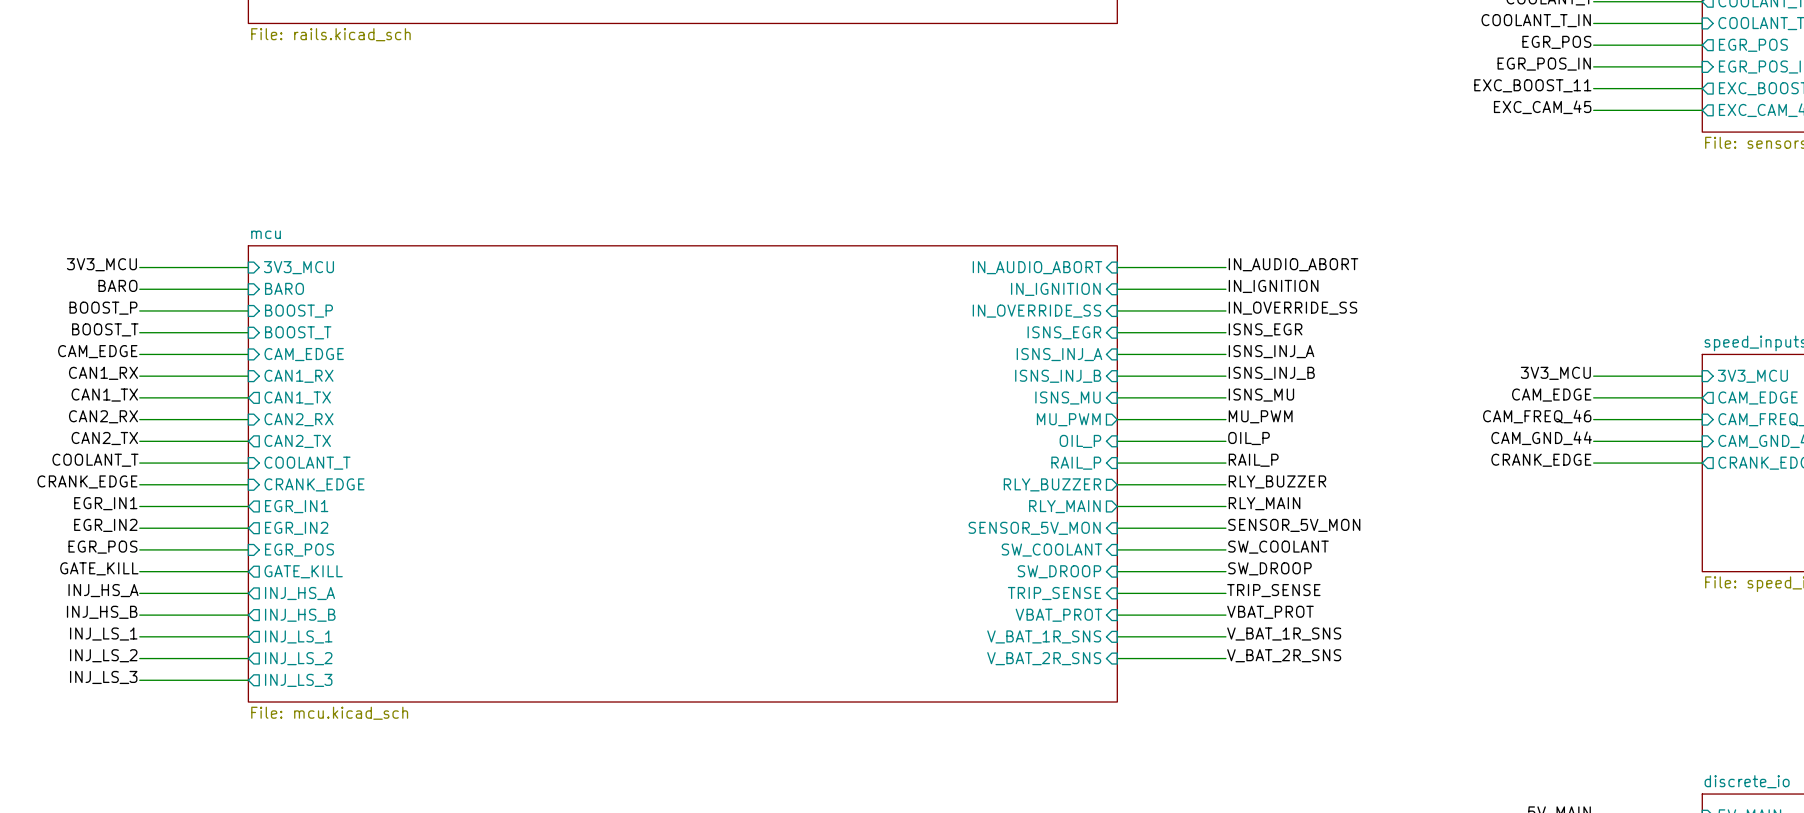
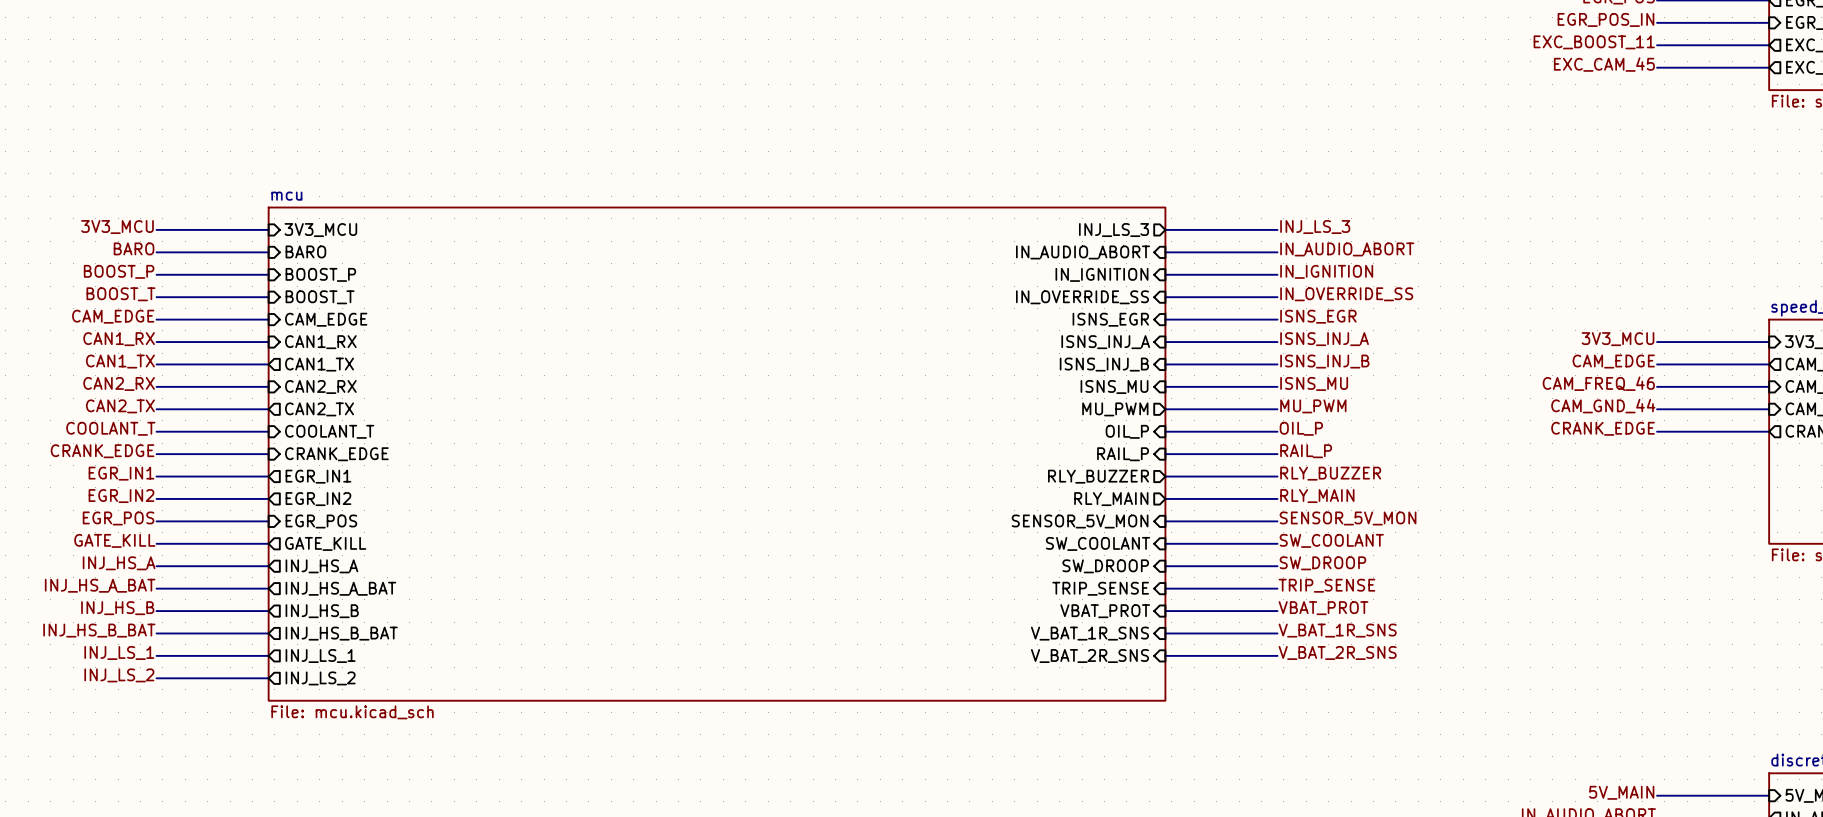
label: IN_AUDIO_ABORT (1293, 264) -> INJ_LS_3 (1315, 227)
sheet pin shape: input (1037, 267) -> output (1113, 230)
sheet pin: IN_AUDIO_ABORT (1037, 267) -> INJ_LS_3 (1113, 230)
label: IN_IGNITION (1273, 286) -> IN_AUDIO_ABORT (1347, 249)
sheet pin: IN_IGNITION (1055, 289) -> IN_AUDIO_ABORT (1083, 252)
label: IN_OVERRIDE_SS (1292, 308) -> IN_IGNITION (1326, 271)
sheet pin: IN_OVERRIDE_SS (1036, 311) -> IN_IGNITION (1101, 274)
label: ISNS_EGR (1265, 329) -> IN_OVERRIDE_SS (1346, 294)
sheet pin: ISNS_EGR (1064, 332) -> IN_OVERRIDE_SS (1082, 297)
label: ISNS_INJ_A (1271, 351) -> ISNS_EGR (1318, 316)
sheet pin: ISNS_INJ_A (1059, 354) -> ISNS_EGR (1110, 319)
label: ISNS_INJ_B (1271, 373) -> ISNS_INJ_A (1324, 339)
sheet pin: ISNS_INJ_B (1058, 376) -> ISNS_INJ_A (1105, 342)
label: ISNS_MU (1261, 395) -> ISNS_INJ_B (1324, 361)
sheet pin: ISNS_MU (1068, 397) -> ISNS_INJ_B (1104, 364)
label: MU_PWM (1260, 416) -> ISNS_MU (1314, 383)
sheet pin shape: output (1068, 419) -> input (1114, 386)
sheet pin: MU_PWM (1068, 419) -> ISNS_MU (1114, 386)
label: OIL_P (1249, 438) -> MU_PWM (1313, 406)
sheet pin shape: input (1080, 441) -> output (1115, 409)
sheet pin: OIL_P (1080, 441) -> MU_PWM (1115, 409)
label: RAIL_P (1253, 460) -> OIL_P (1301, 428)
sheet pin: RAIL_P (1076, 463) -> OIL_P (1127, 431)
sheet mcu: File: mcu.kicad_sch (682, 473) -> none
label: RLY_BUZZER (1277, 481) -> RAIL_P (1306, 451)
sheet mcu: none -> File: mcu.kicad_sch (717, 454)
sheet pin shape: output (1052, 484) -> input (1123, 454)
sheet pin: RLY_BUZZER (1052, 484) -> RAIL_P (1123, 454)
label: RLY_MAIN (1264, 503) -> RLY_BUZZER (1330, 473)
sheet pin: RLY_MAIN (1064, 506) -> RLY_BUZZER (1098, 476)
label: SENSOR_5V_MON (1294, 525) -> RLY_MAIN (1317, 496)
sheet pin shape: input (1034, 528) -> output (1111, 499)
sheet pin: SENSOR_5V_MON (1034, 528) -> RLY_MAIN (1111, 499)
label: SW_COOLANT (1278, 547) -> SENSOR_5V_MON (1348, 518)
sheet pin: SW_COOLANT (1051, 550) -> SENSOR_5V_MON (1080, 521)
label: SW_DROOP (1269, 568) -> SW_COOLANT (1331, 540)
sheet pin: SW_DROOP (1059, 571) -> SW_COOLANT (1097, 543)
label: TRIP_SENSE (1273, 590) -> SW_DROOP (1322, 563)
sheet pin: TRIP_SENSE (1054, 593) -> SW_DROOP (1105, 566)
label: INJ_HS_B (102, 612) -> INJ_HS_A_BAT (100, 585)
label: VBAT_PROT (1270, 612) -> TRIP_SENSE (1326, 585)
sheet pin: INJ_HS_B (300, 615) -> INJ_HS_A_BAT (340, 588)
sheet pin: VBAT_PROT (1058, 615) -> TRIP_SENSE (1100, 588)
label: INJ_LS_1 (103, 634) -> INJ_HS_B (117, 608)
label: V_BAT_1R_SNS (1284, 634) -> VBAT_PROT (1323, 608)
sheet pin: INJ_LS_1 (298, 636) -> INJ_HS_B (322, 611)
sheet pin: V_BAT_1R_SNS (1044, 636) -> VBAT_PROT (1105, 611)
label: INJ_LS_2 (103, 655) -> INJ_HS_B_BAT (99, 630)
label: V_BAT_2R_SNS (1284, 655) -> V_BAT_1R_SNS (1337, 630)
sheet pin: INJ_LS_2 (298, 658) -> INJ_HS_B_BAT (341, 633)
sheet pin: V_BAT_2R_SNS (1044, 658) -> V_BAT_1R_SNS (1089, 633)
label: INJ_LS_3 (103, 677) -> INJ_LS_1 (119, 652)
label: none -> V_BAT_2R_SNS (1337, 652)
sheet pin: INJ_LS_3 (298, 680) -> INJ_LS_1 (320, 656)
sheet pin: none -> V_BAT_2R_SNS (1089, 656)
wire: none -> (1165, 655) (1277, 655)
label: none -> INJ_LS_2 (119, 675)
wire: none -> (156, 678) (268, 678)
sheet pin: none -> INJ_LS_2 (320, 678)

